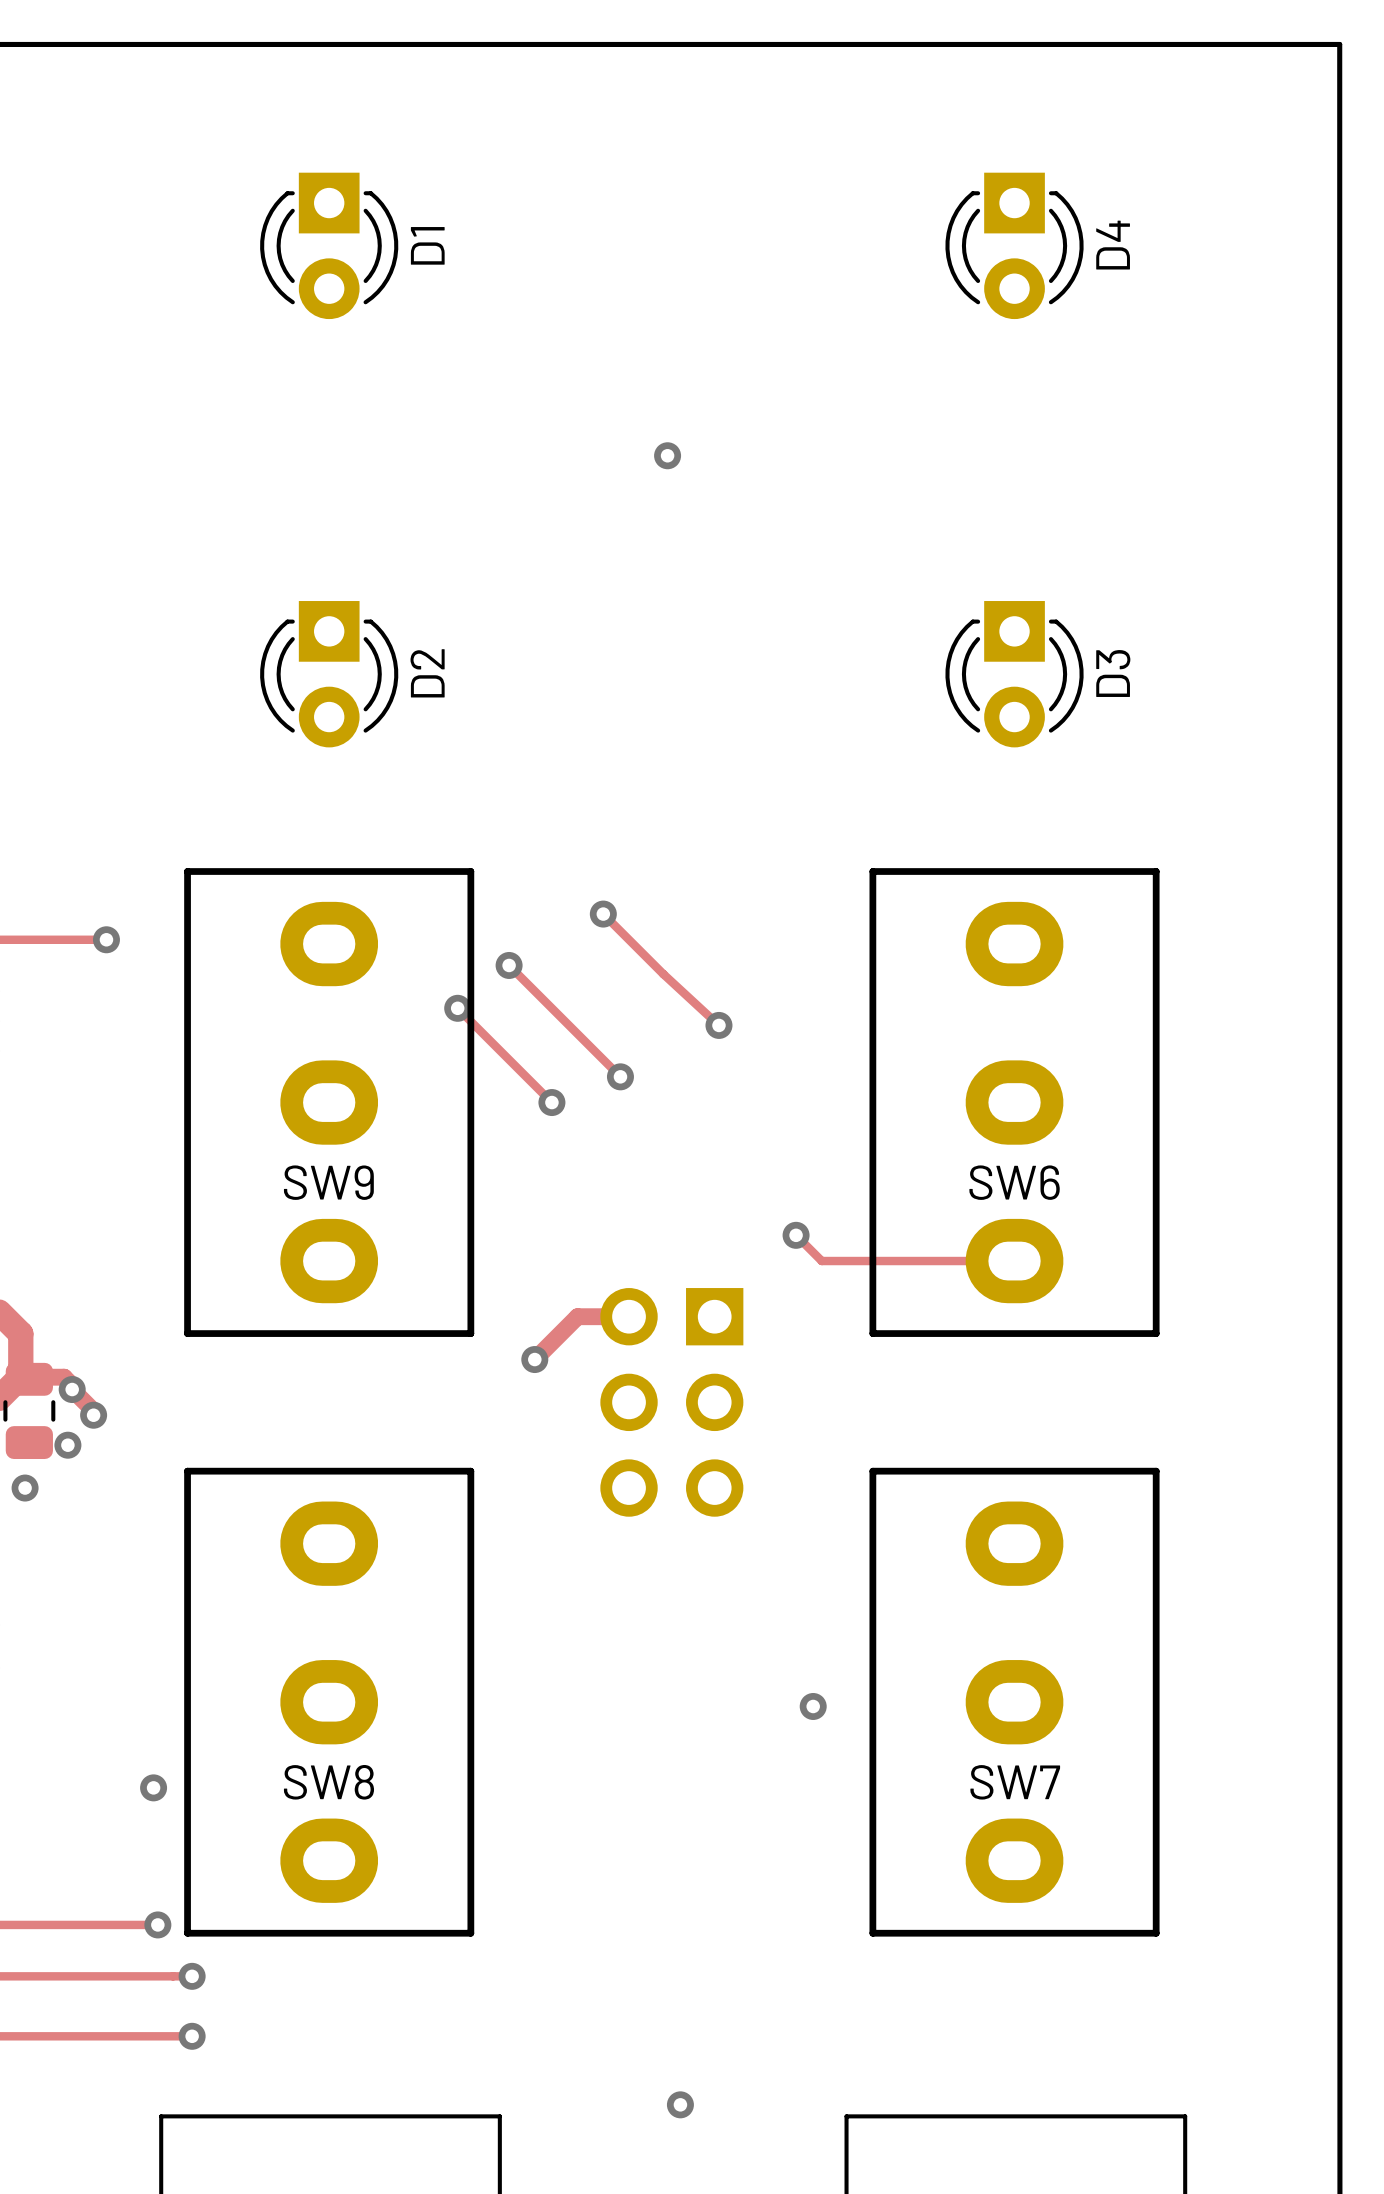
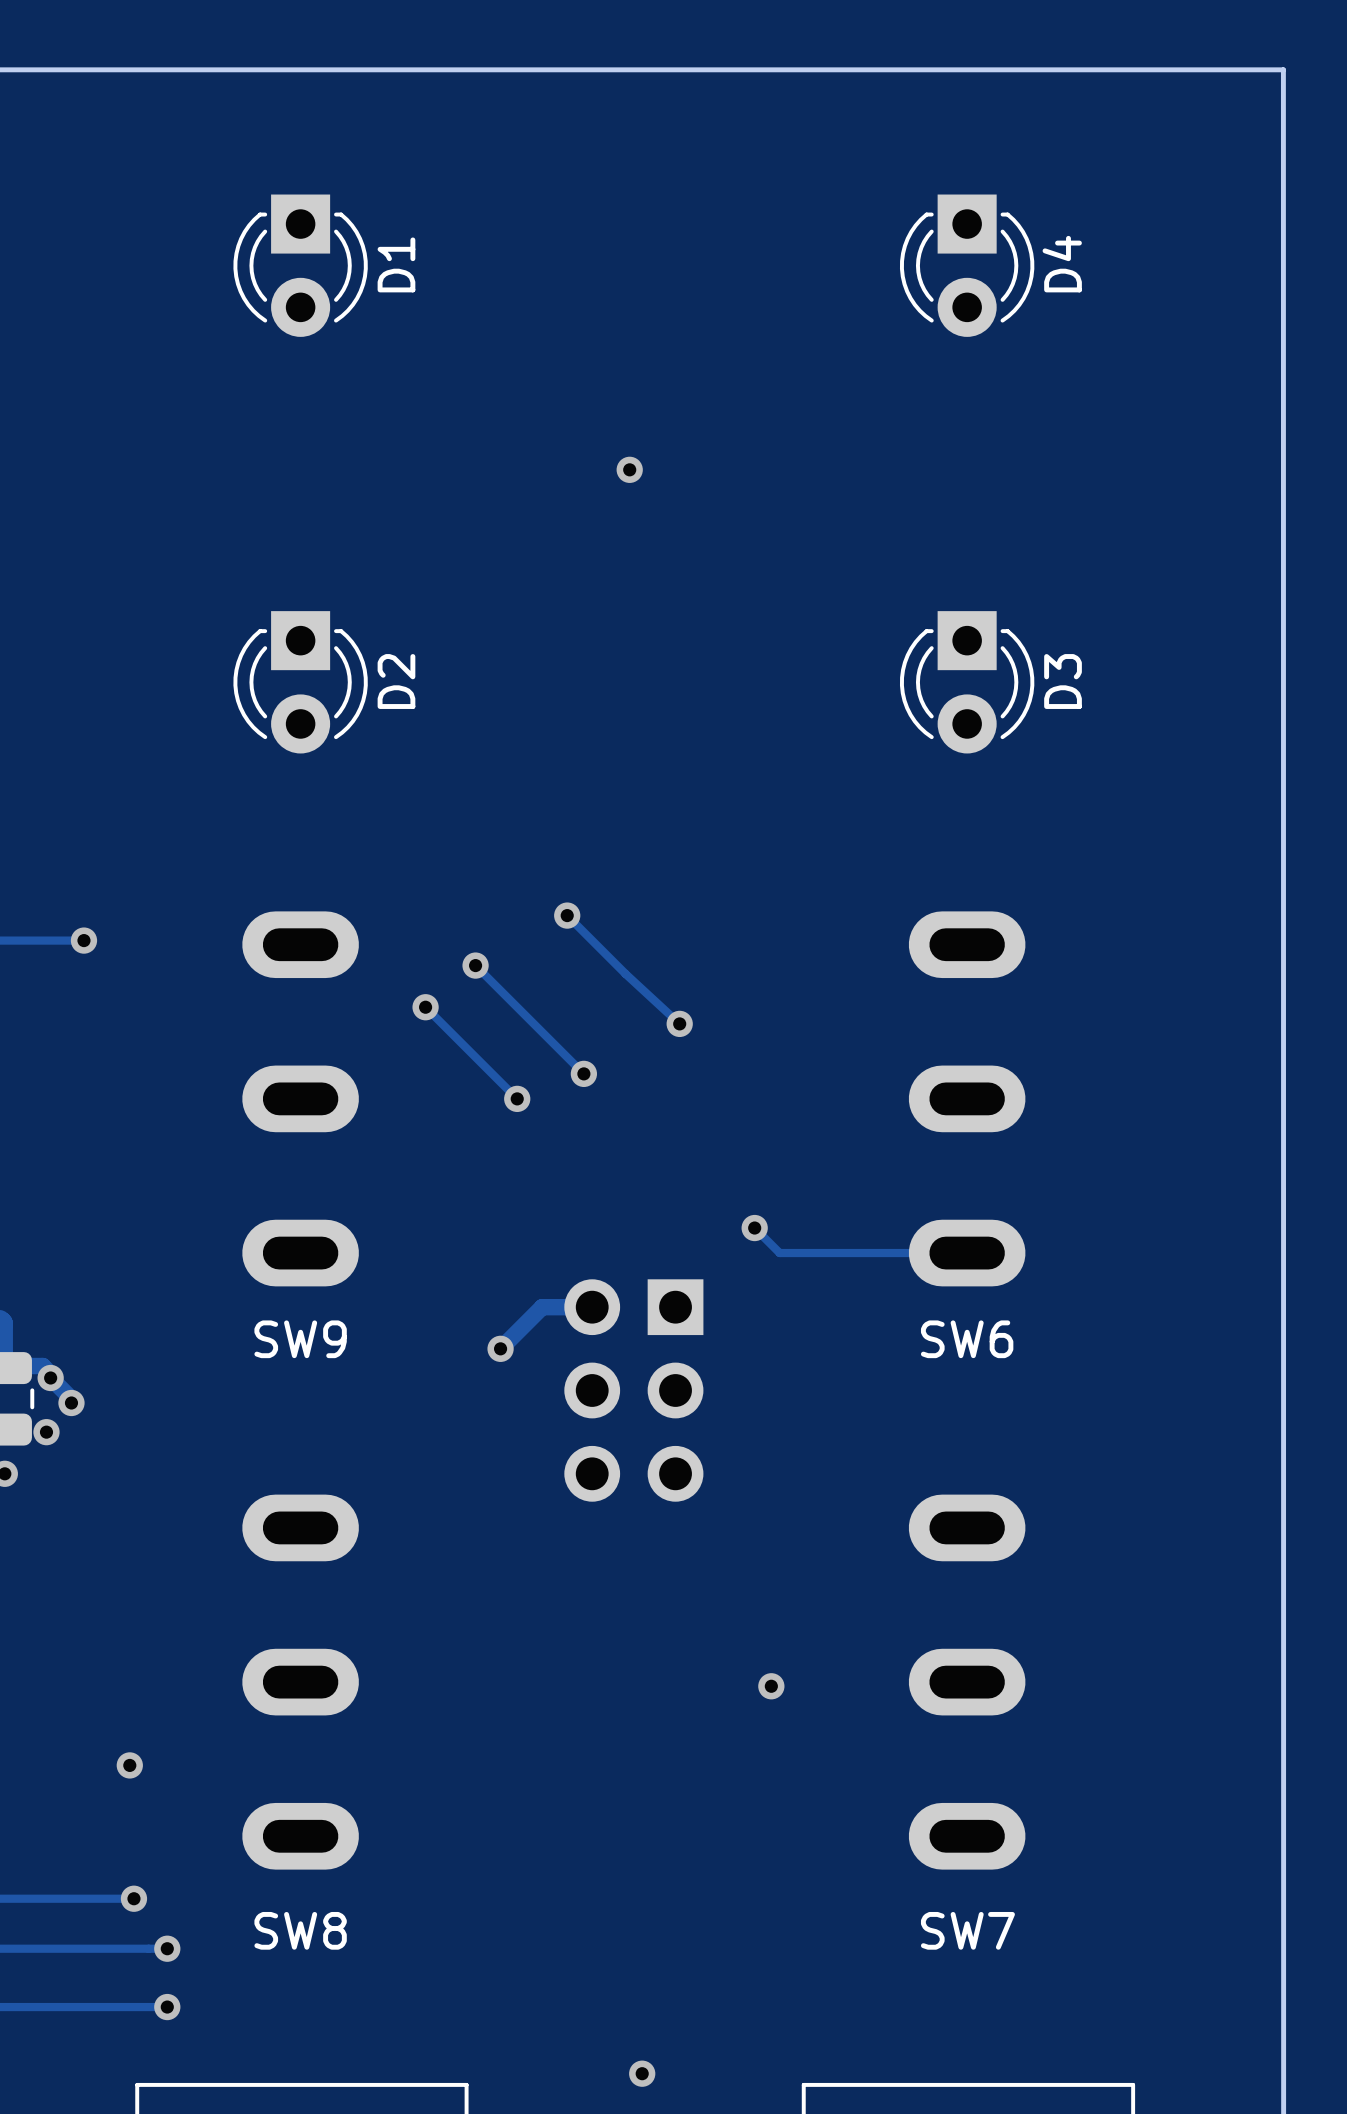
SW9 footprint: [184, 868, 475, 1337] -> [242, 911, 359, 1287]
SW6 footprint: [869, 868, 1160, 1337] -> [908, 911, 1026, 1287]
SW9 name position: SW9 (328, 1182) -> SW9 (300, 1339)
SW6 name position: SW6 (1014, 1182) -> SW6 (967, 1339)
SW8 footprint: [184, 1467, 475, 1937] -> [242, 1494, 359, 1870]
SW7 footprint: [869, 1467, 1160, 1937] -> [908, 1494, 1026, 1870]
SW8 name position: SW8 (328, 1782) -> SW8 (300, 1930)
SW7 name position: SW7 (1015, 1782) -> SW7 (967, 1930)

